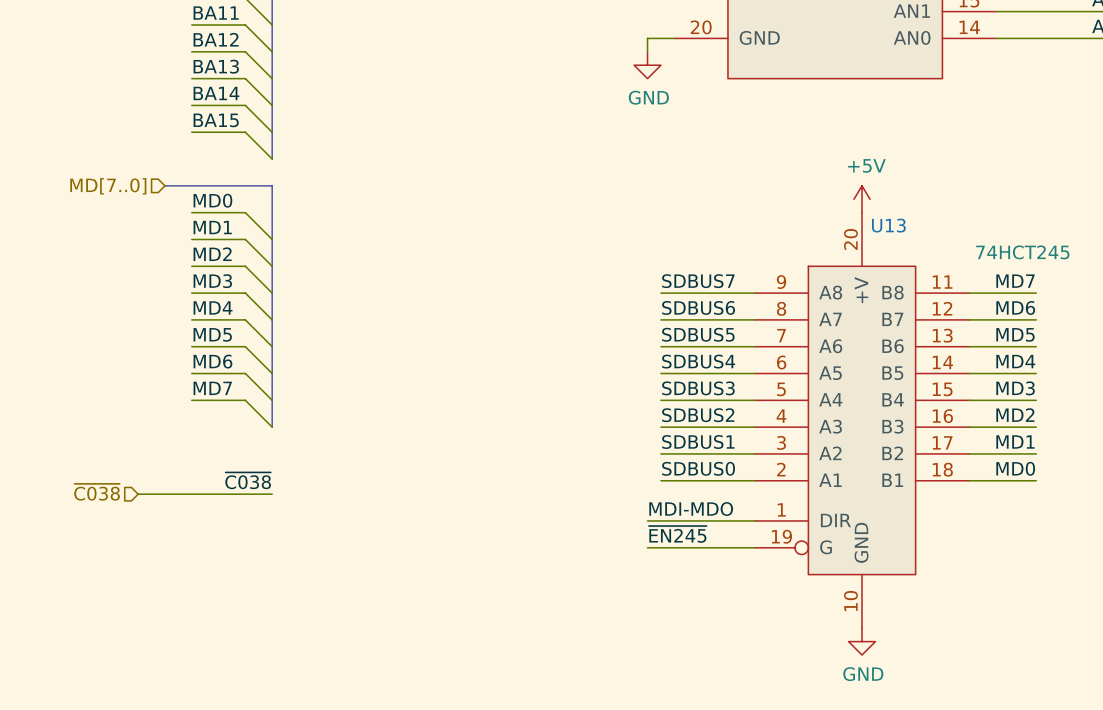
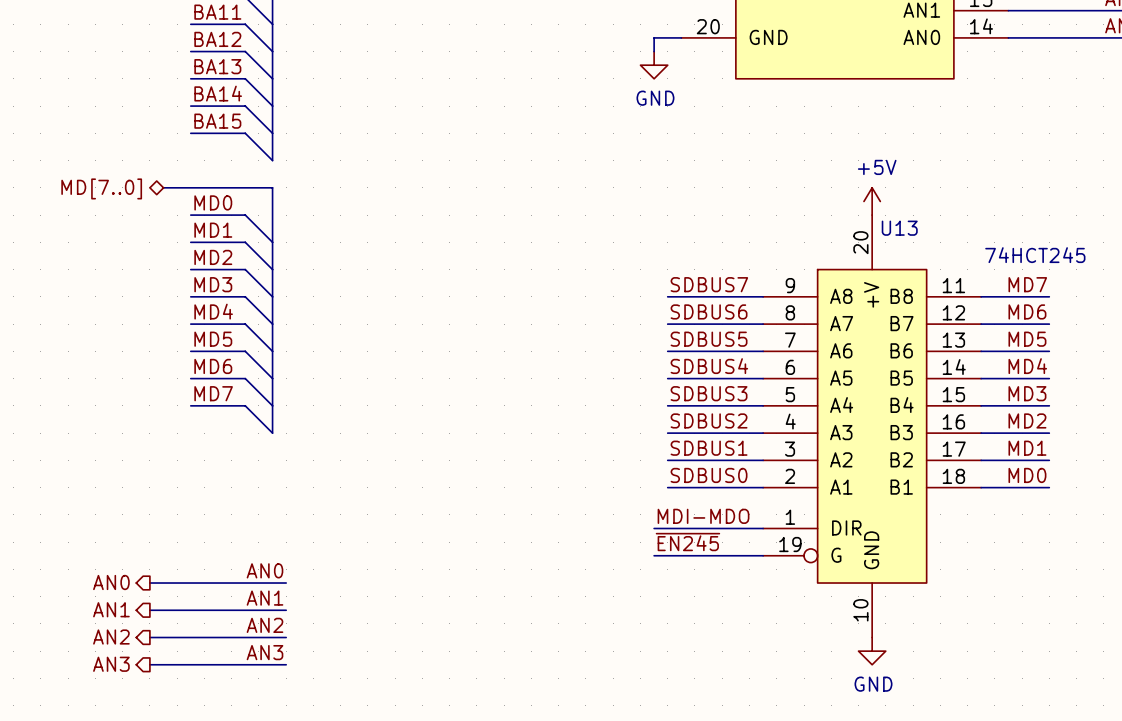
hierarchical label shape: input (108, 186) -> bidirectional (101, 188)
label: ~{C038} (248, 480) -> none
hierarchical label: ~{C038} (97, 492) -> none
wire: (138, 494) (272, 494) -> (149, 583) (286, 583)
label: none -> AN0 (264, 570)
hierarchical label: none -> AN0 (111, 582)
label: none -> AN1 (264, 598)
hierarchical label: none -> AN1 (111, 609)
wire: none -> (149, 610) (286, 610)
label: none -> AN2 (264, 625)
hierarchical label: none -> AN2 (111, 637)
wire: none -> (149, 637) (286, 637)
label: none -> AN3 (264, 652)
hierarchical label: none -> AN3 (111, 664)
wire: none -> (149, 664) (286, 664)

